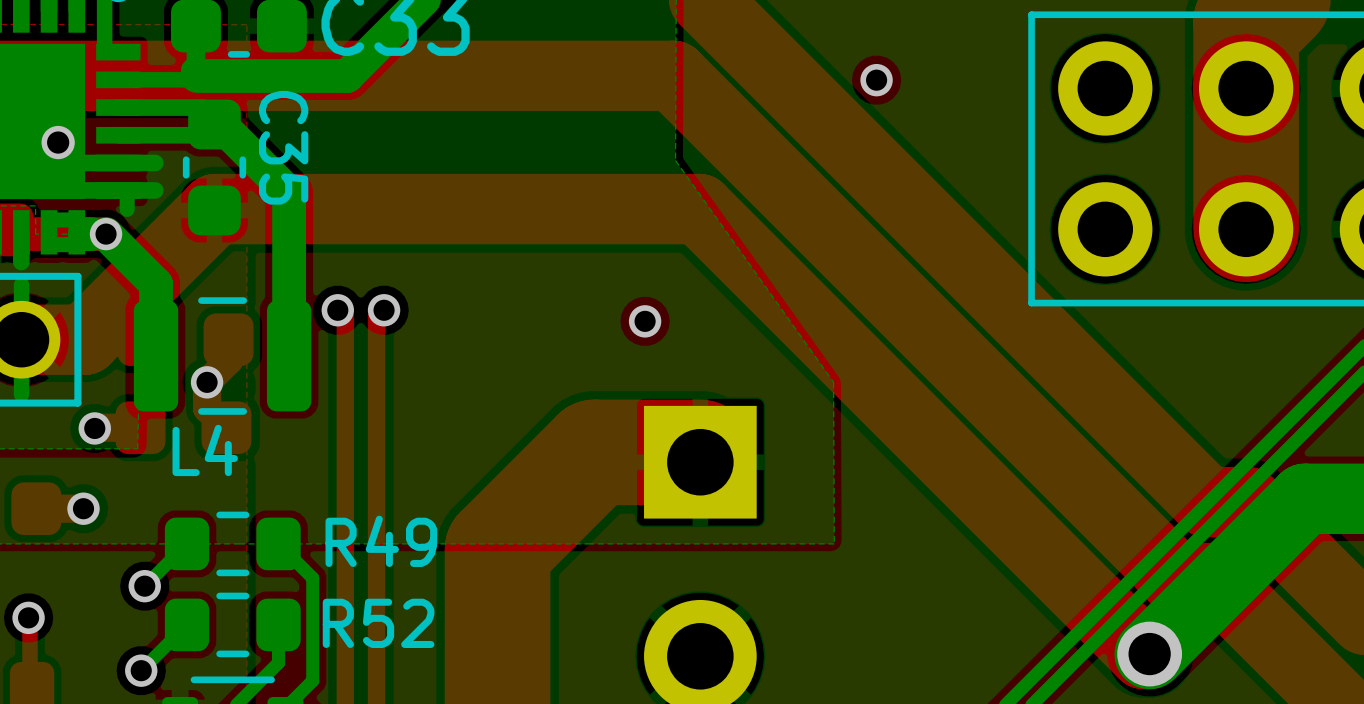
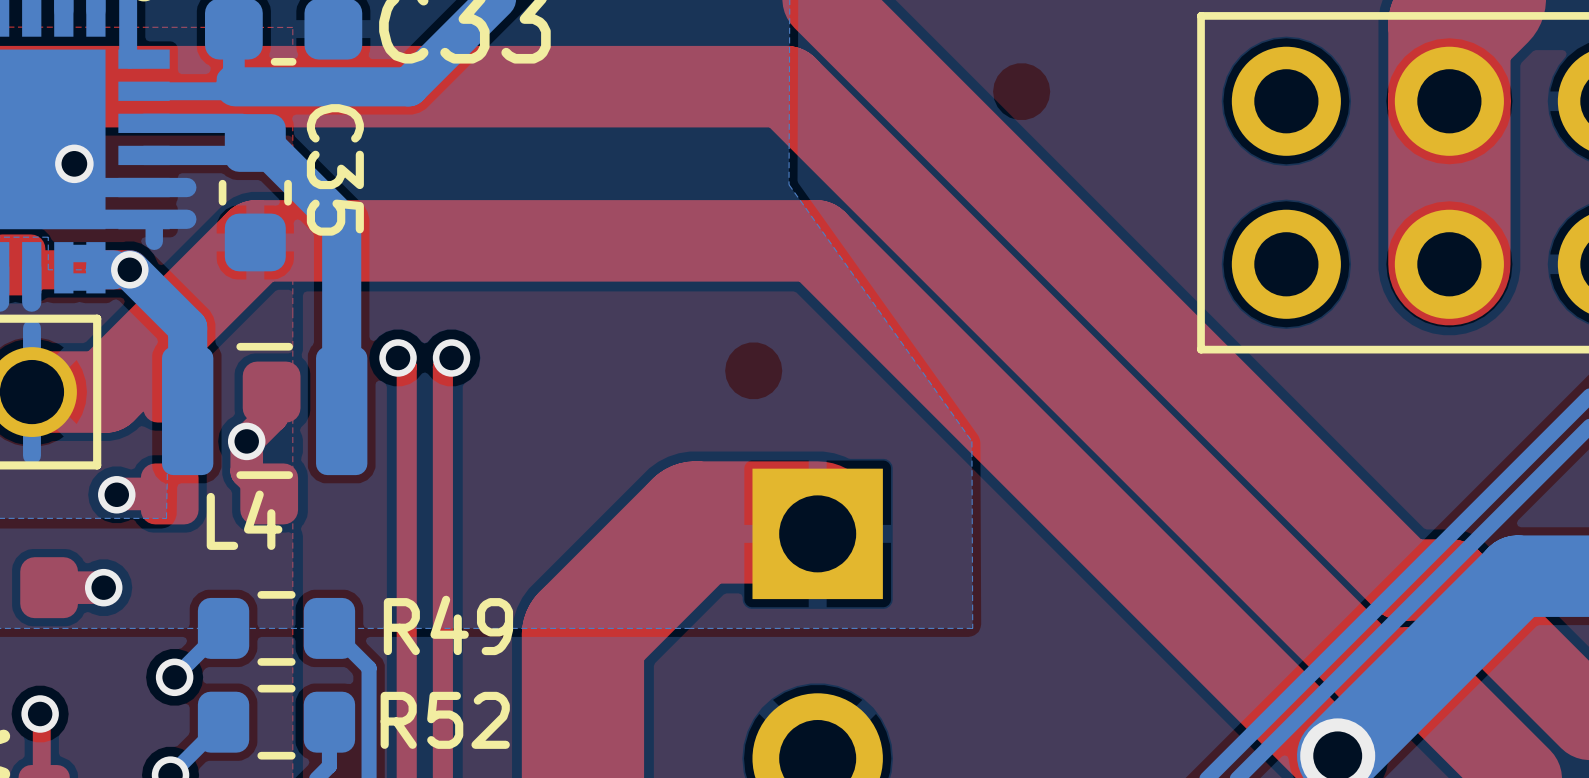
via: (876, 80) -> none
via: (645, 321) -> none

